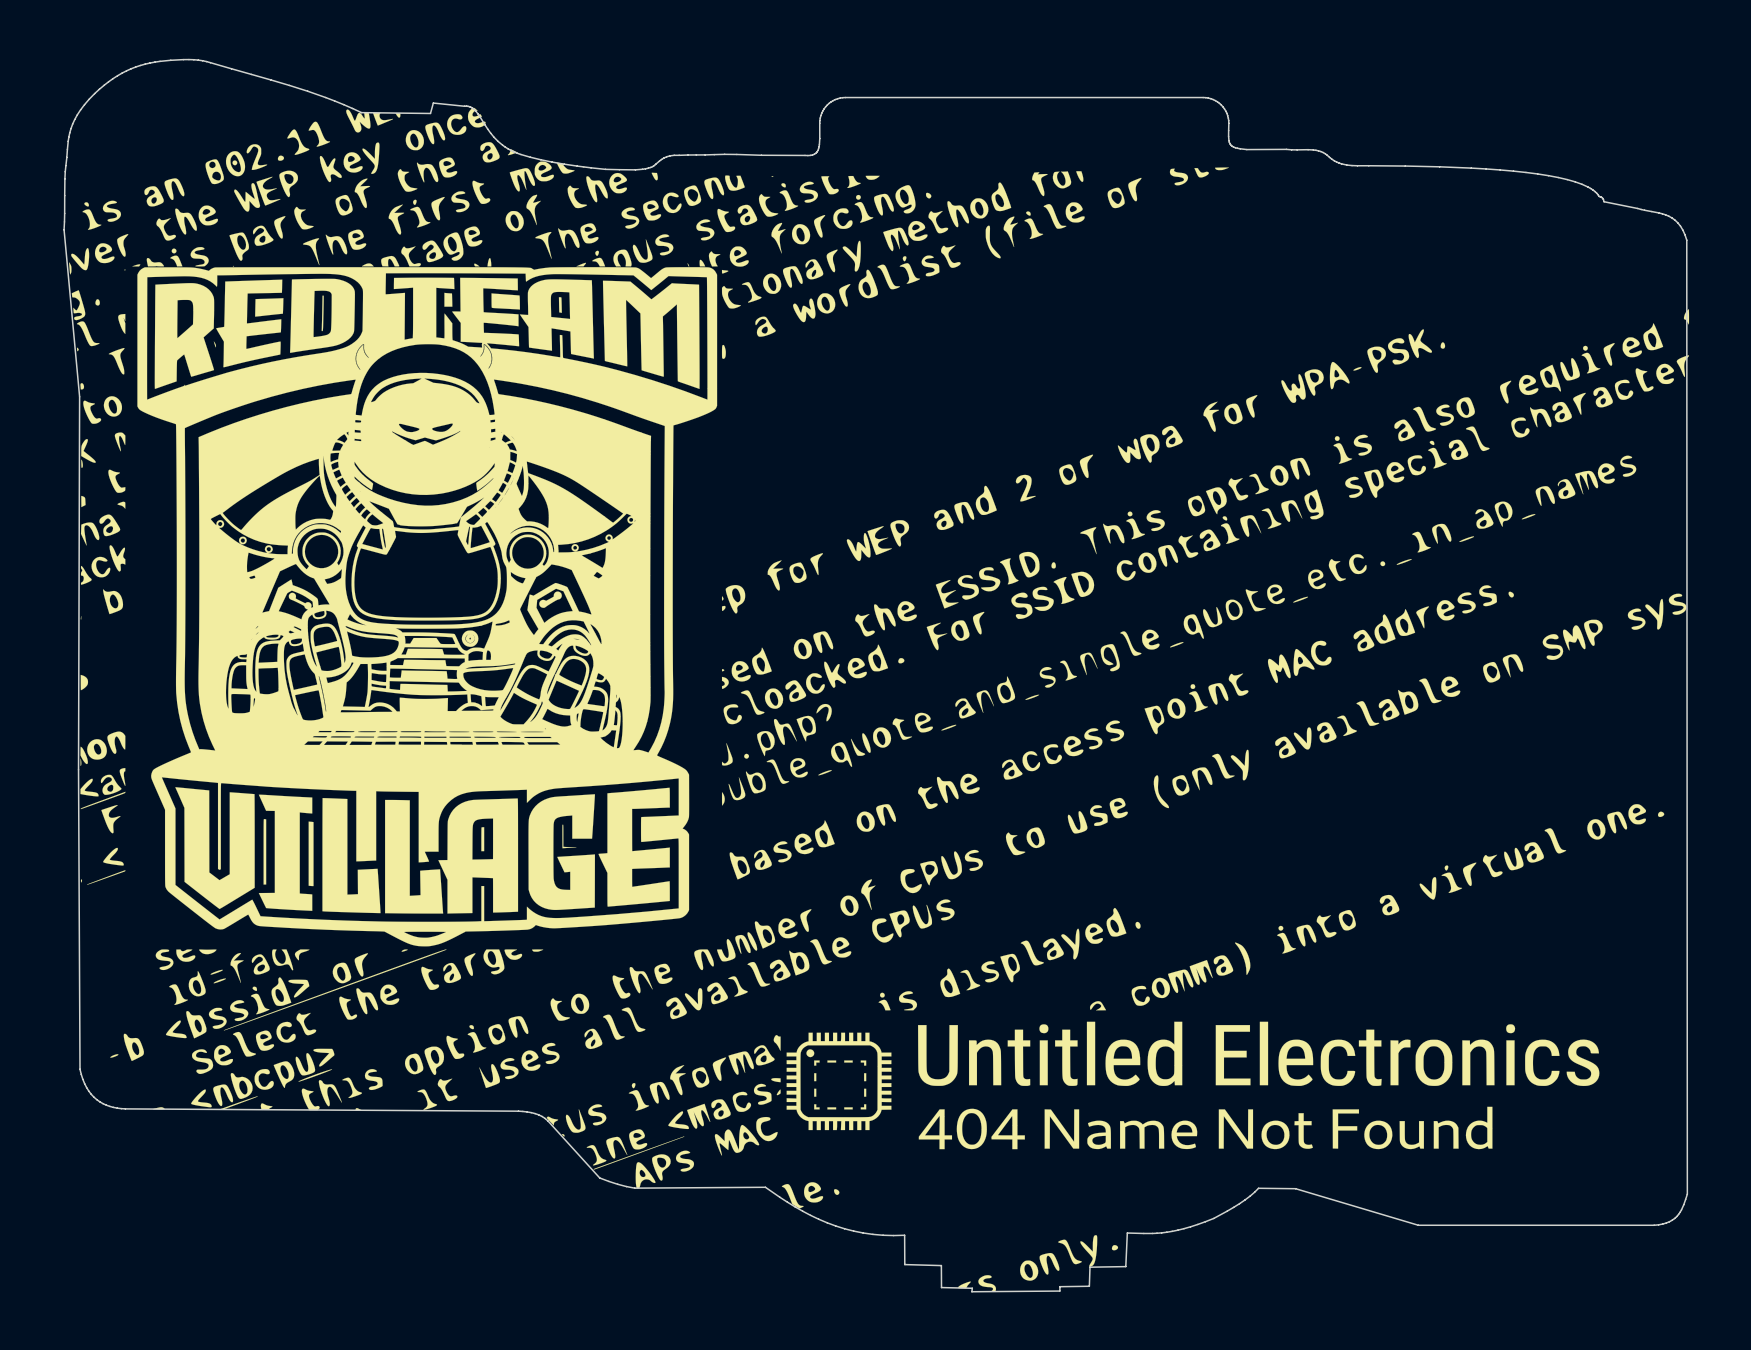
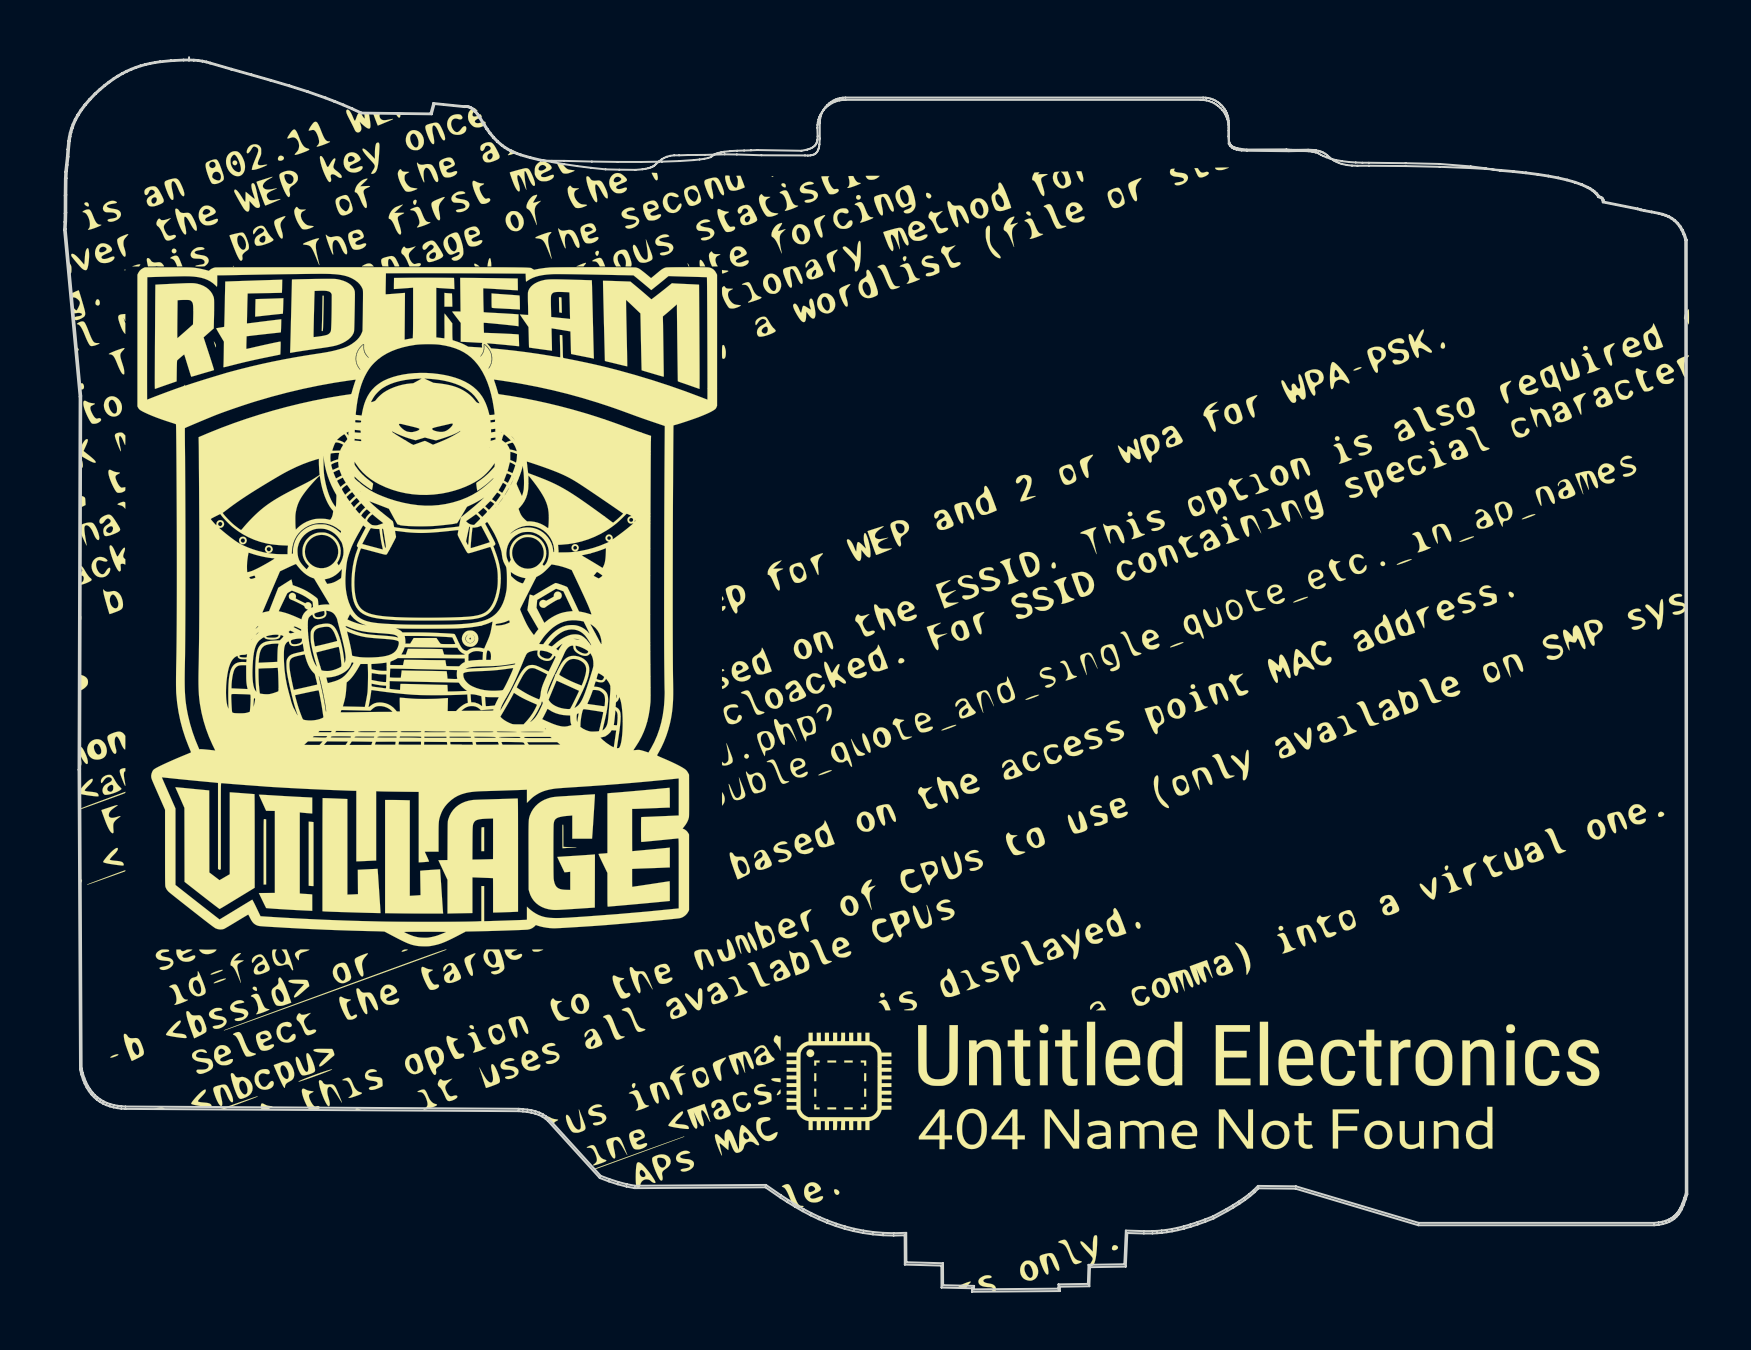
board edge: none -> (189, 57) (188, 60) (206, 62) (307, 91) (361, 113) (431, 114) (434, 104) (468, 107) (474, 111) (489, 133) (501, 145) (516, 153) (540, 160) (679, 161) (704, 158) (718, 152) (730, 151) (801, 150) (811, 148) (816, 143) (817, 122) (823, 110) (831, 103) (842, 99) (1203, 99) (1214, 103) (1223, 112) (1228, 124) (1228, 143) (1236, 149) (1308, 151) (1335, 159) (1348, 162) (1439, 163) (1548, 176) (1587, 187) (1601, 198) (1602, 202) (1661, 214) (1674, 220) (1681, 230) (1685, 239) (1685, 1193) (1677, 1212) (1668, 1219) (1654, 1222) (1418, 1222) (1295, 1186) (1257, 1185) (1232, 1205) (1197, 1222) (1161, 1230) (1125, 1230) (1124, 1264) (1088, 1264) (1087, 1283) (1058, 1284) (1058, 1288) (973, 1289) (974, 1285) (943, 1285) (943, 1263) (906, 1262) (906, 1232) (873, 1232) (836, 1223) (803, 1209) (765, 1184) (634, 1185) (600, 1175) (549, 1119) (542, 1114) (531, 1110) (125, 1106) (110, 1104) (97, 1097) (88, 1086) (81, 1068) (81, 395) (65, 228) (66, 171) (69, 140) (74, 123) (85, 104) (100, 89) (118, 76) (136, 67) (160, 62) (188, 60)

